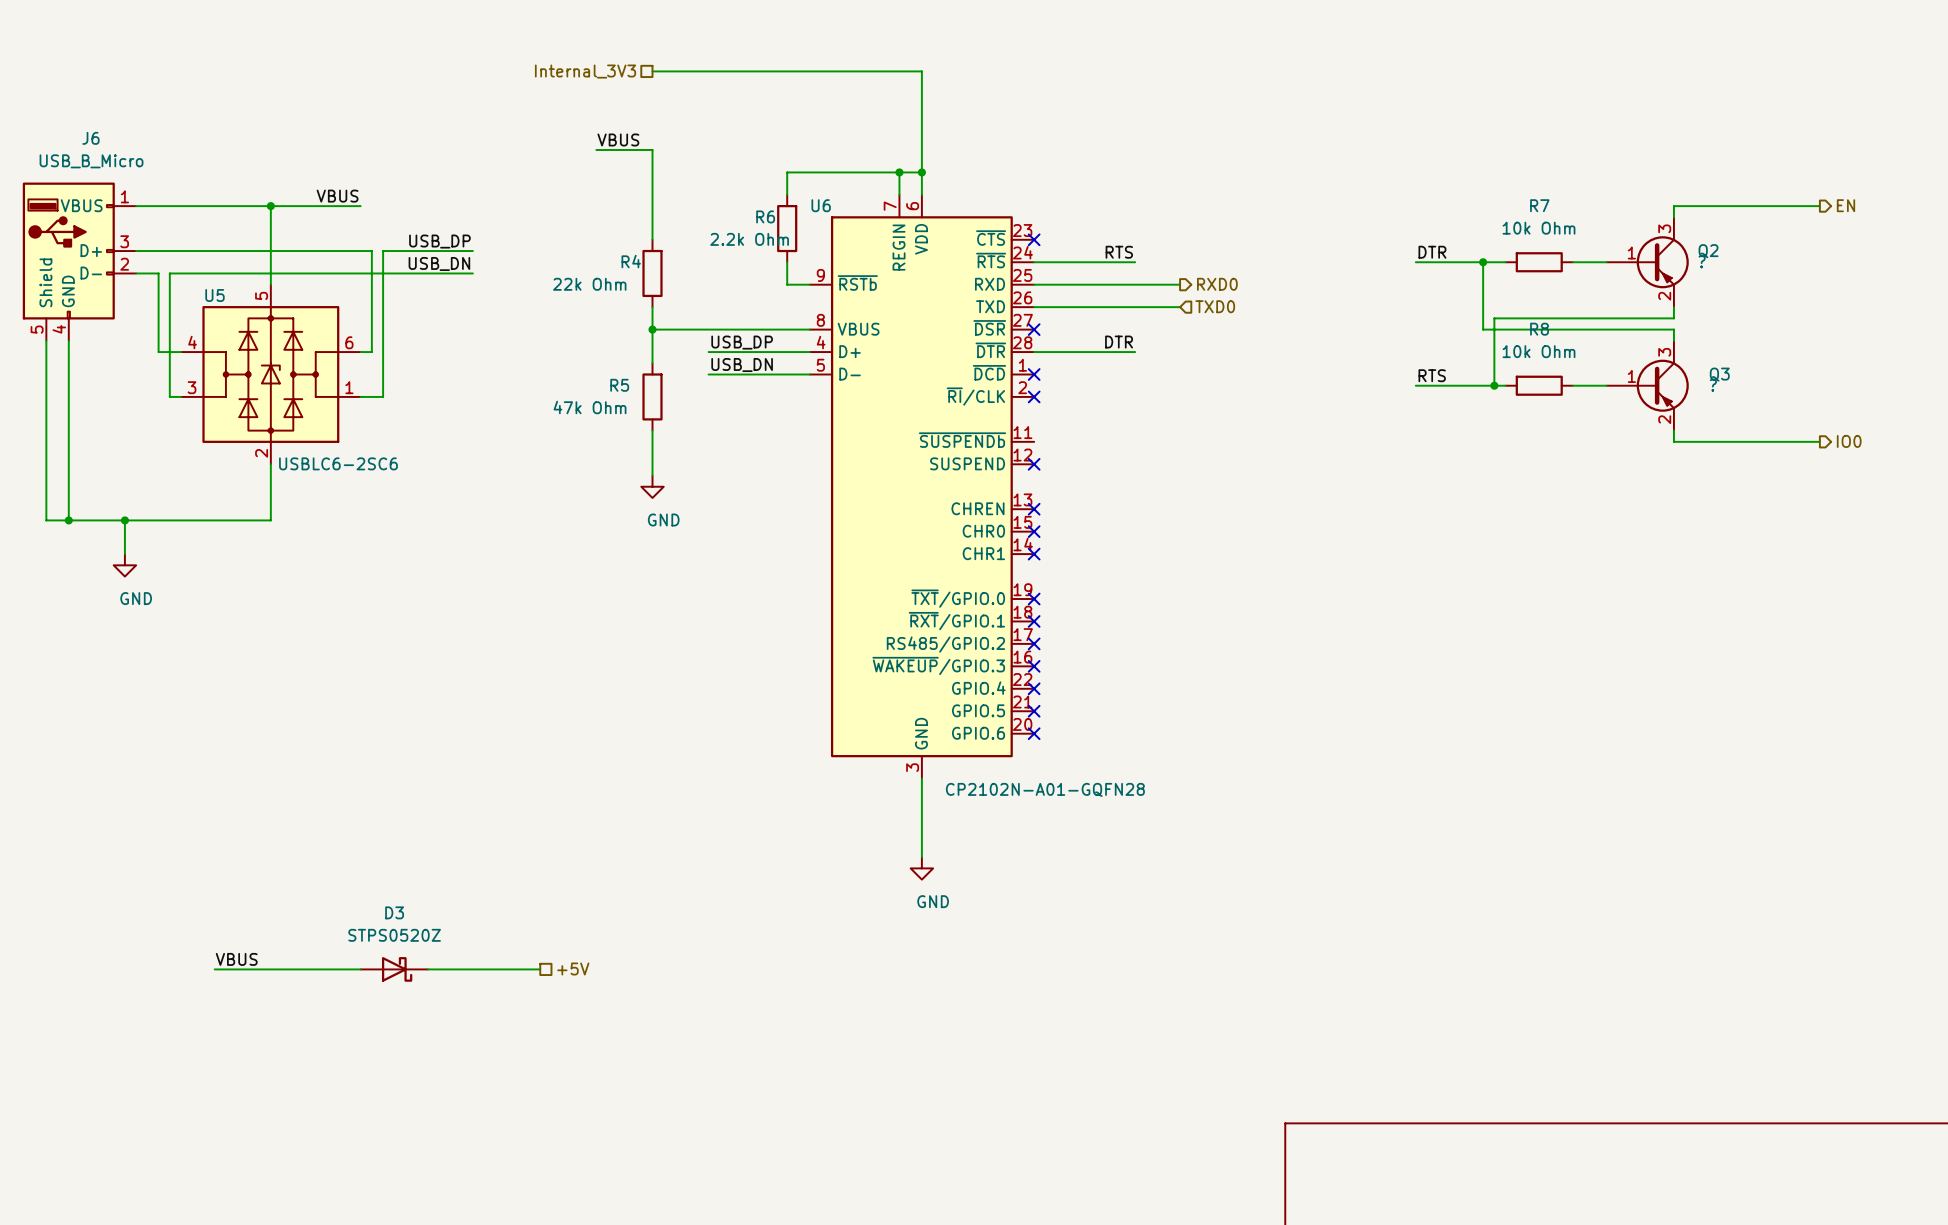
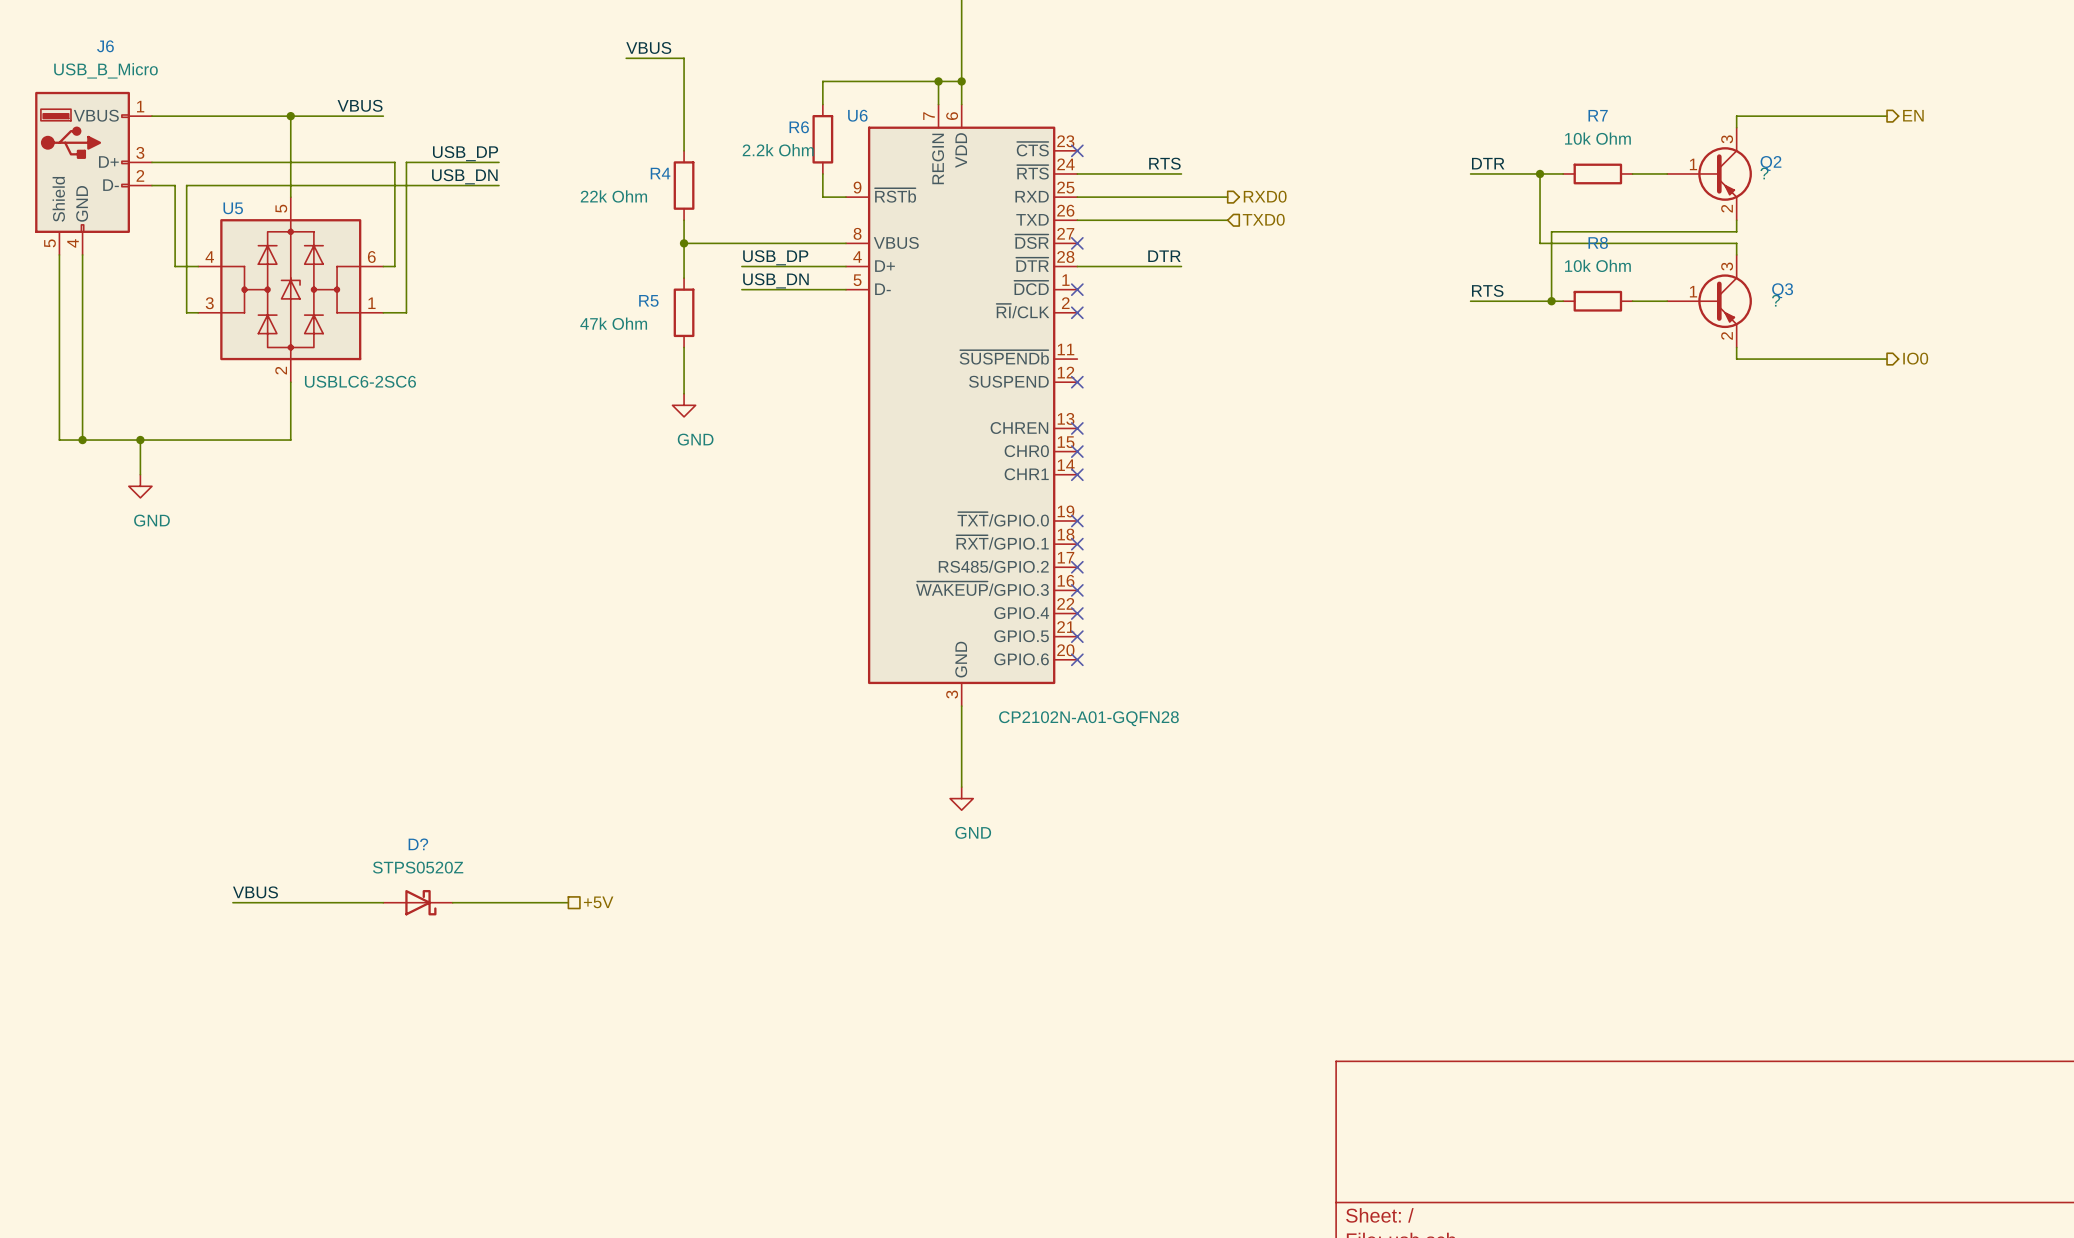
D3 name: D3 (394, 912) -> D? (418, 844)

